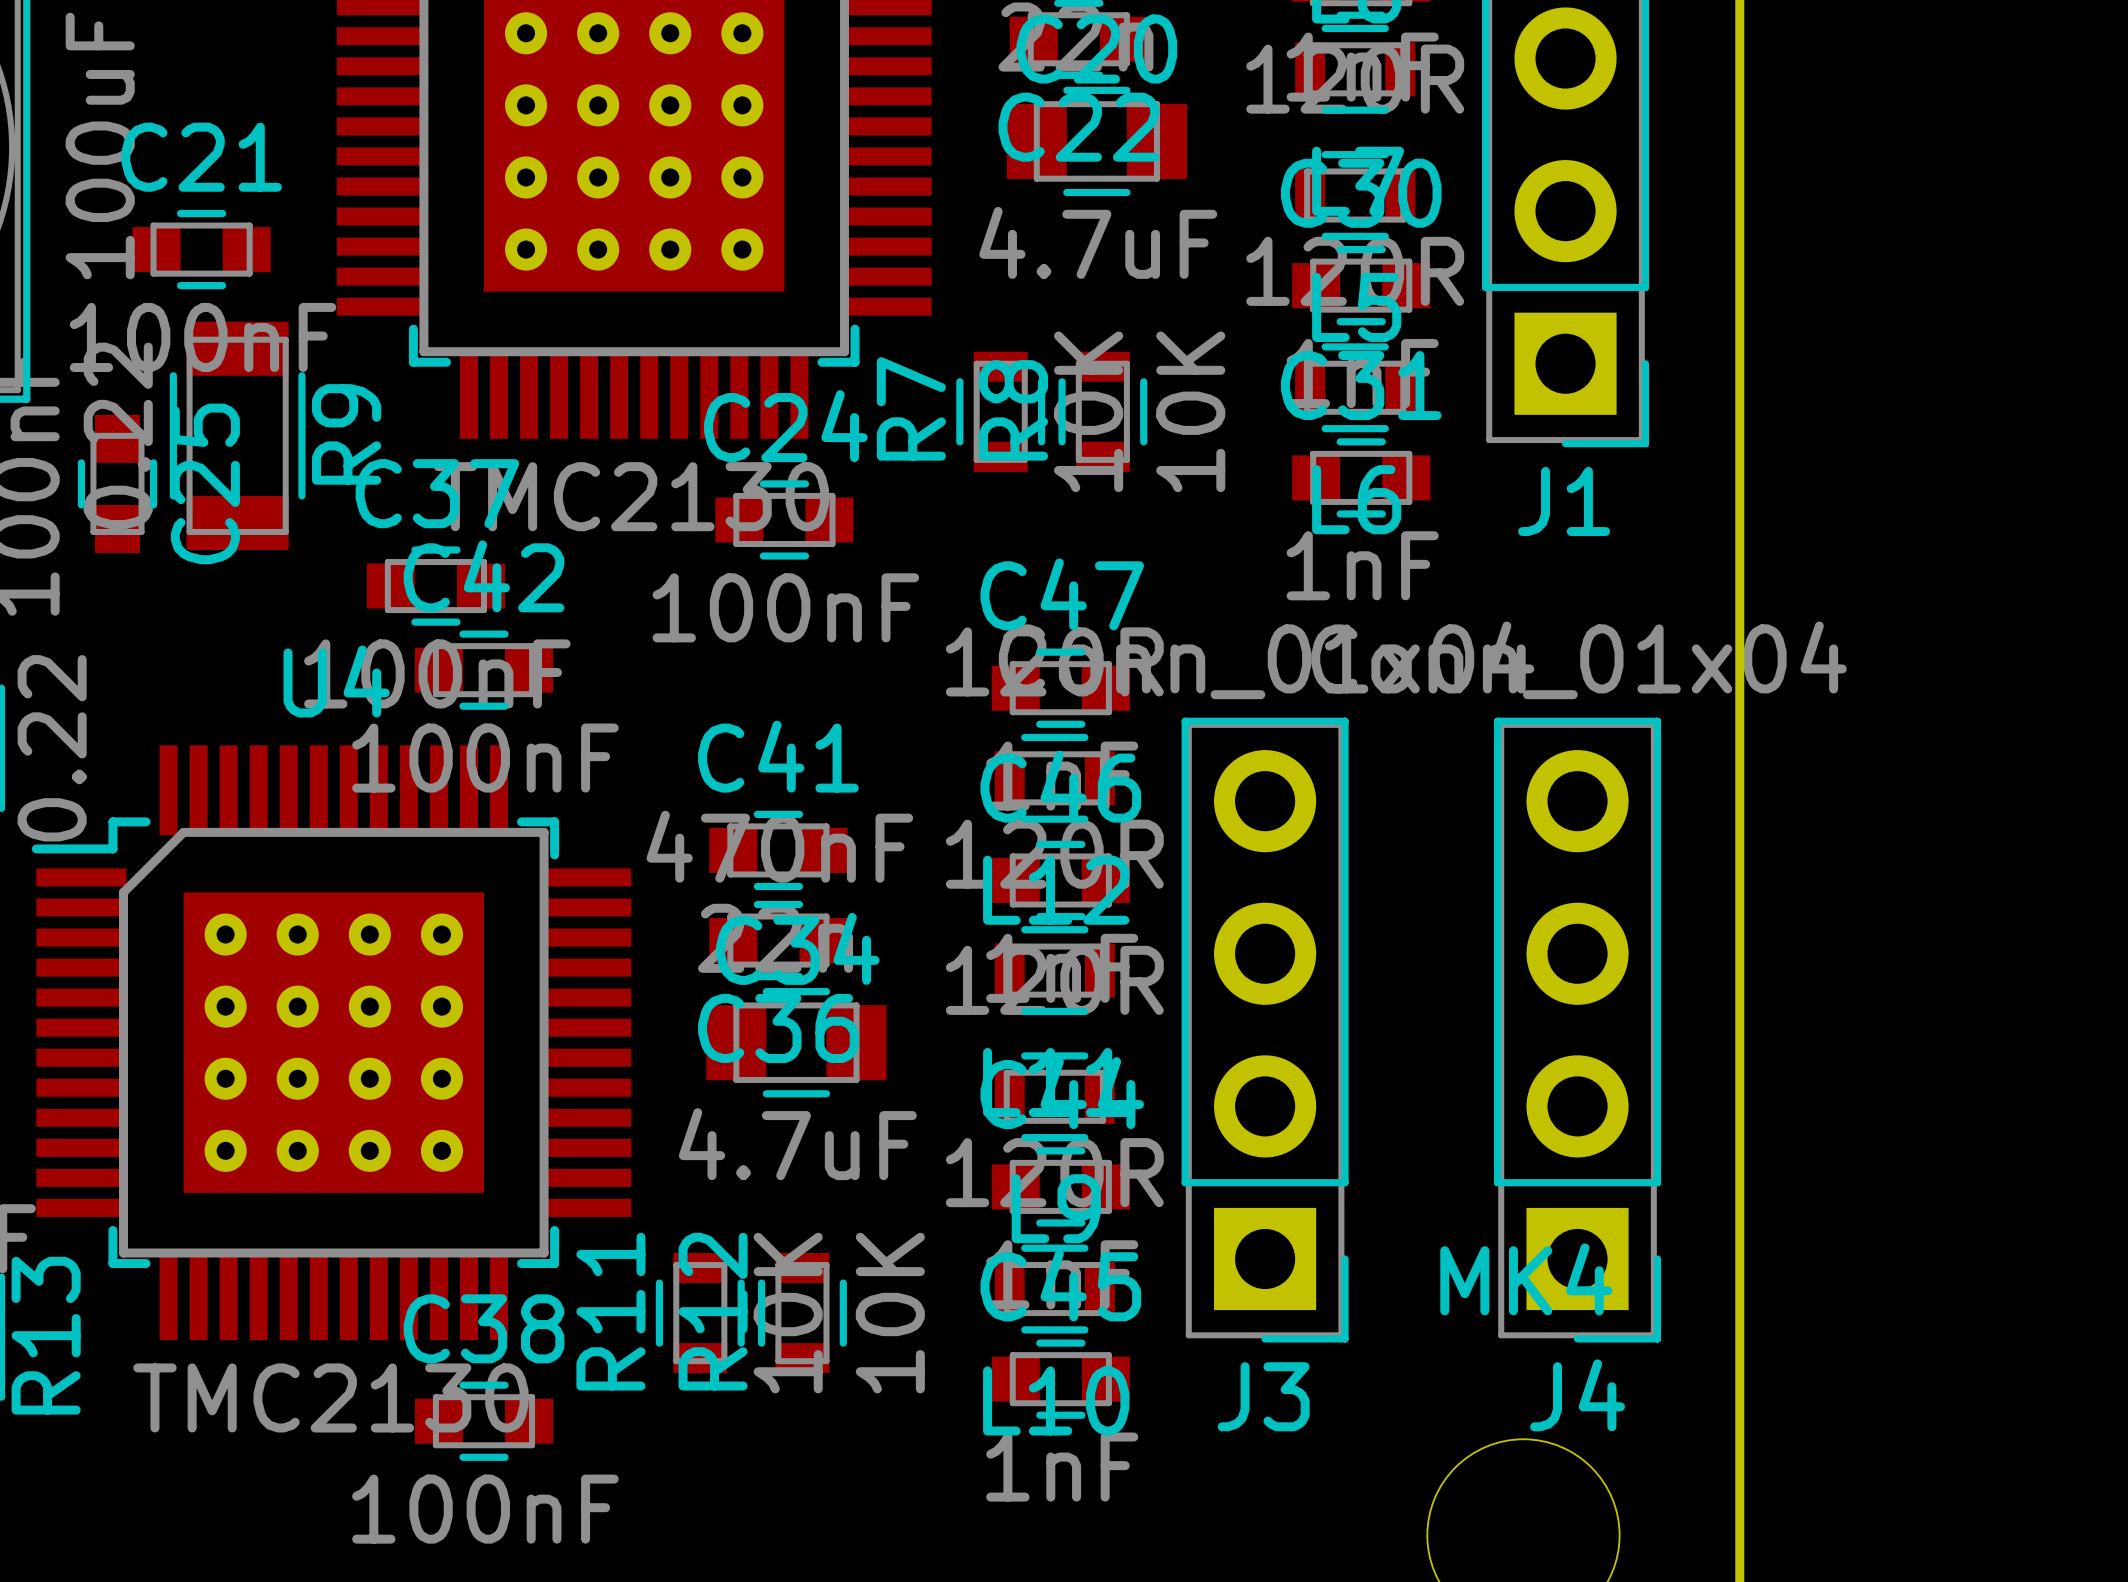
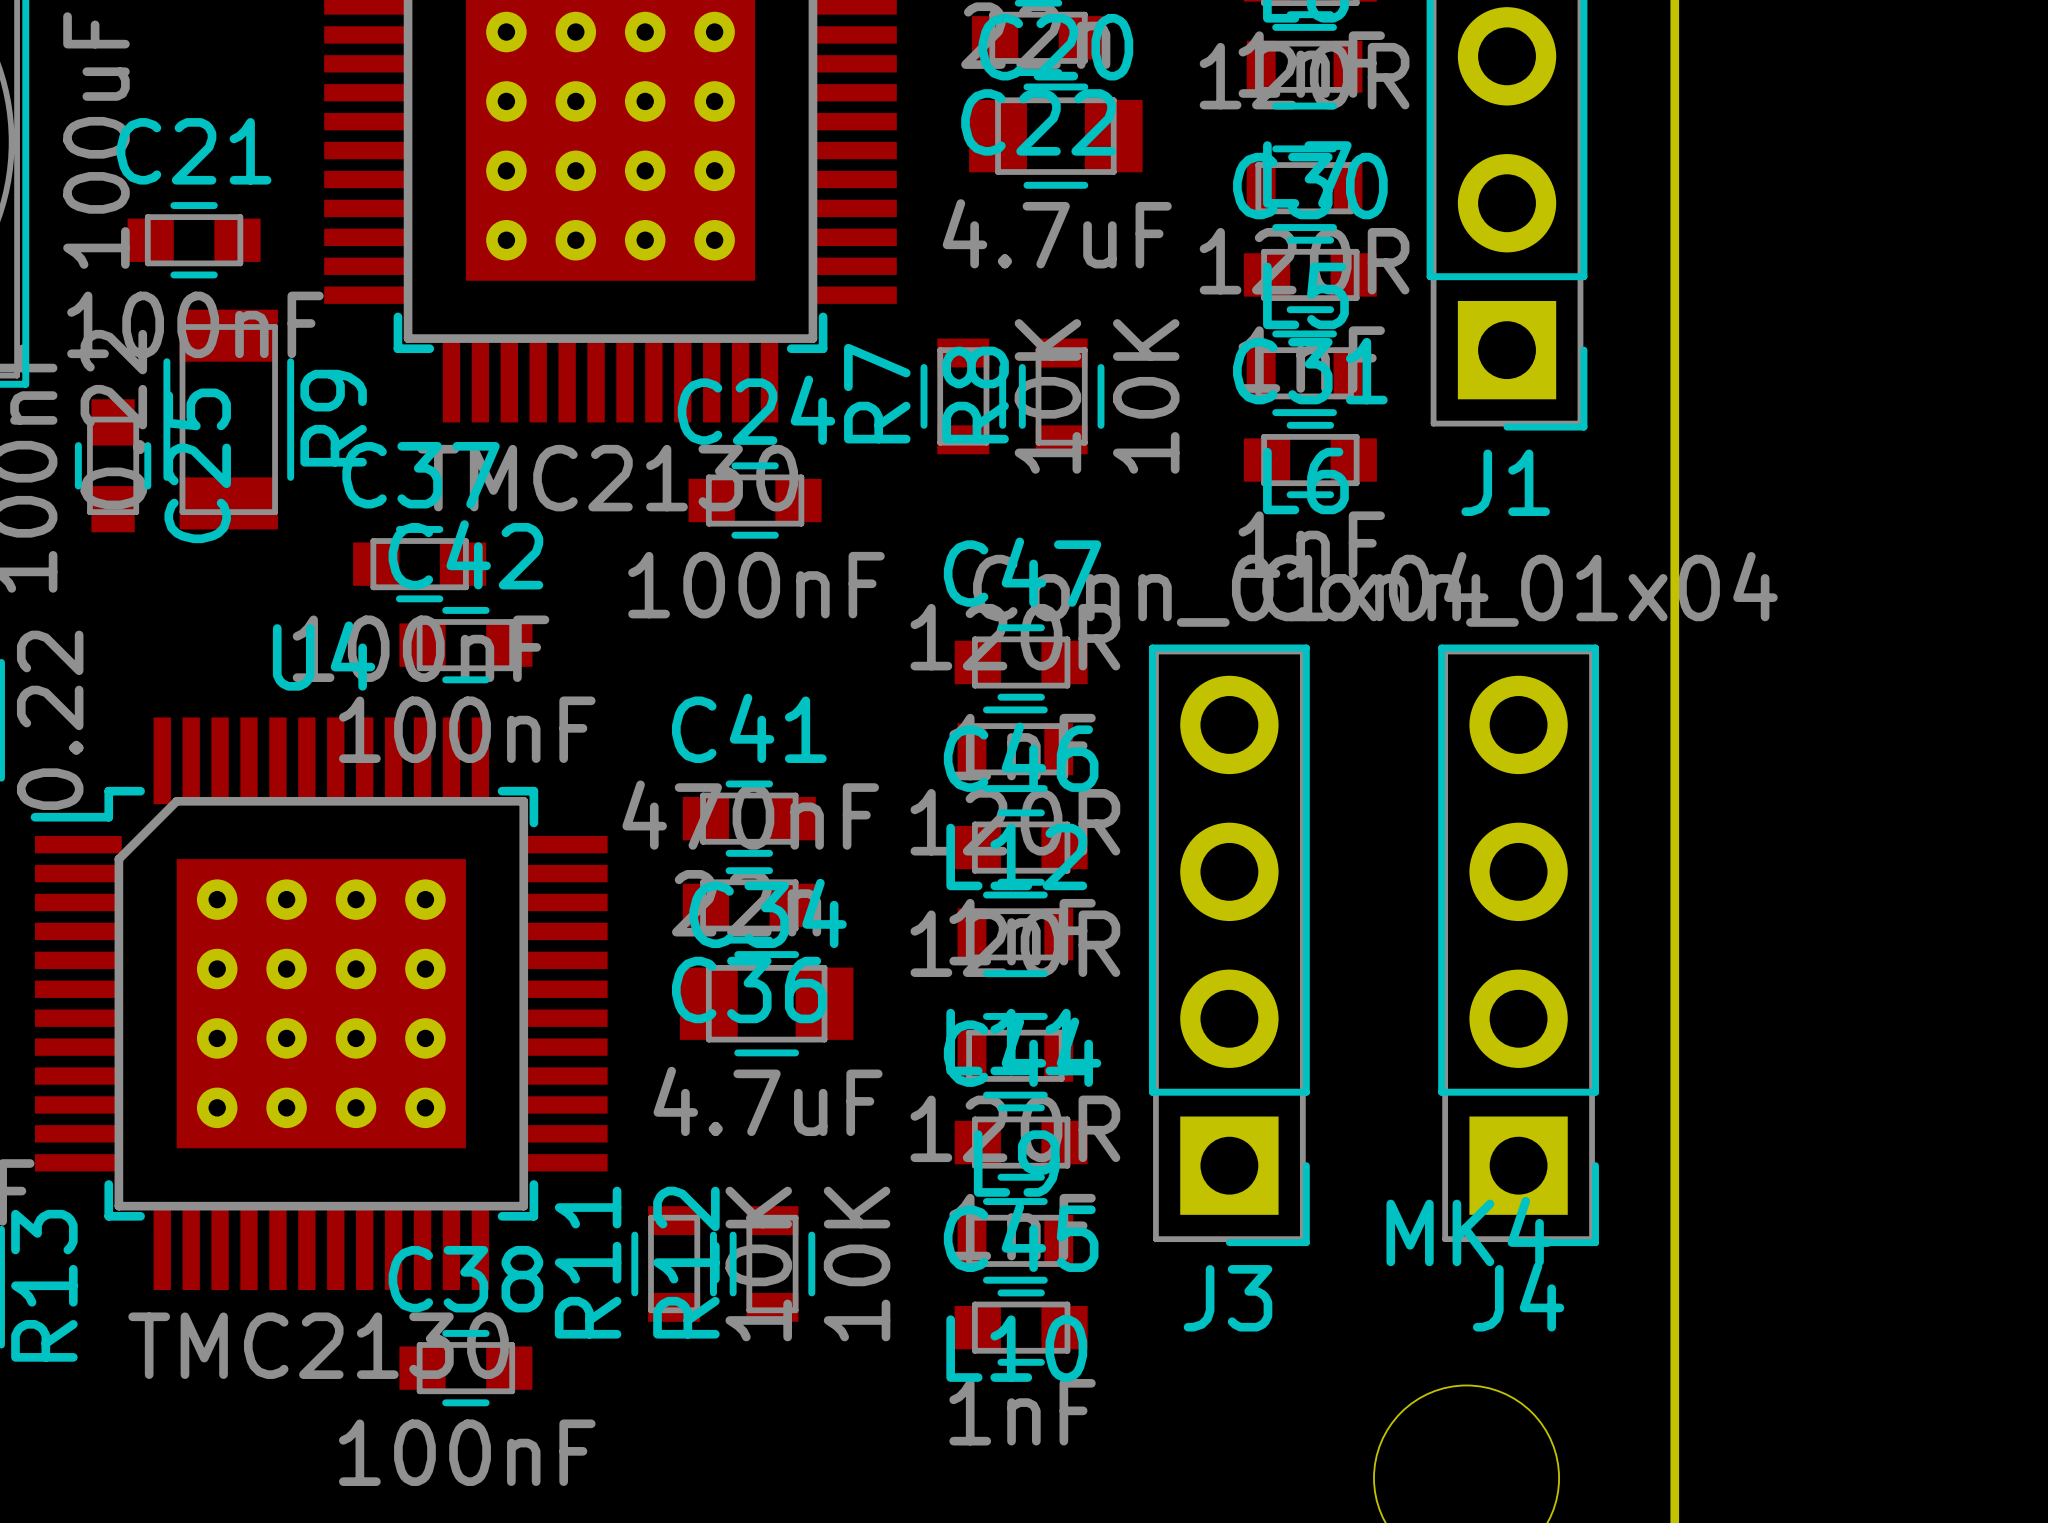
J3 position: (1265, 1030) -> (1229, 945)
J4 position: (1577, 1030) -> (1518, 945)

